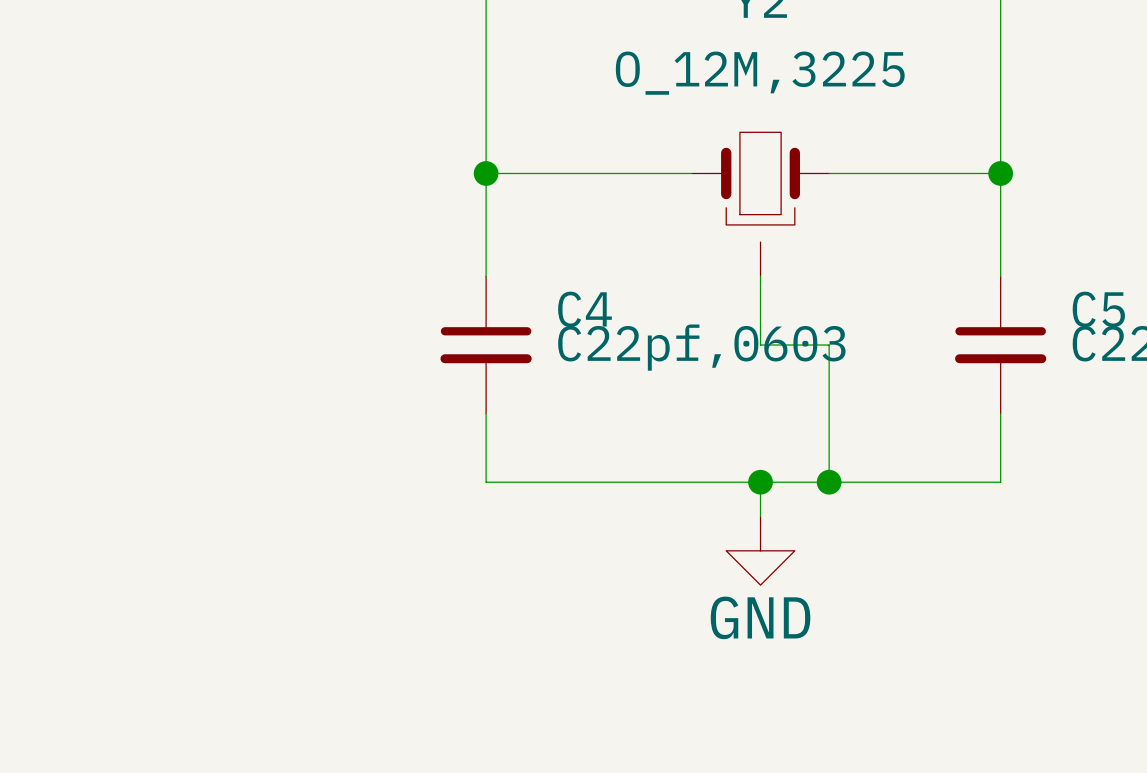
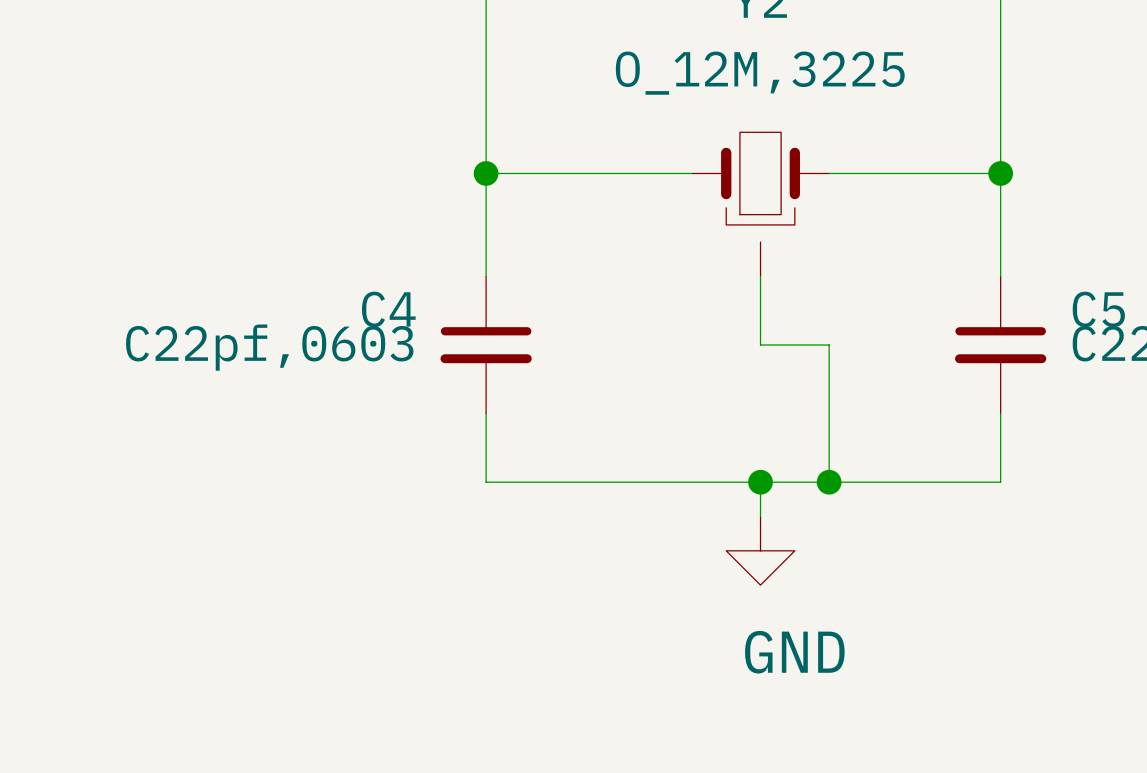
C4 name position: C4 (584, 309) -> C4 (388, 309)
C4 value position: C22pf,0603 (701, 347) -> C22pf,0603 (269, 347)
power symbol text position: GND (760, 617) -> GND (794, 652)

